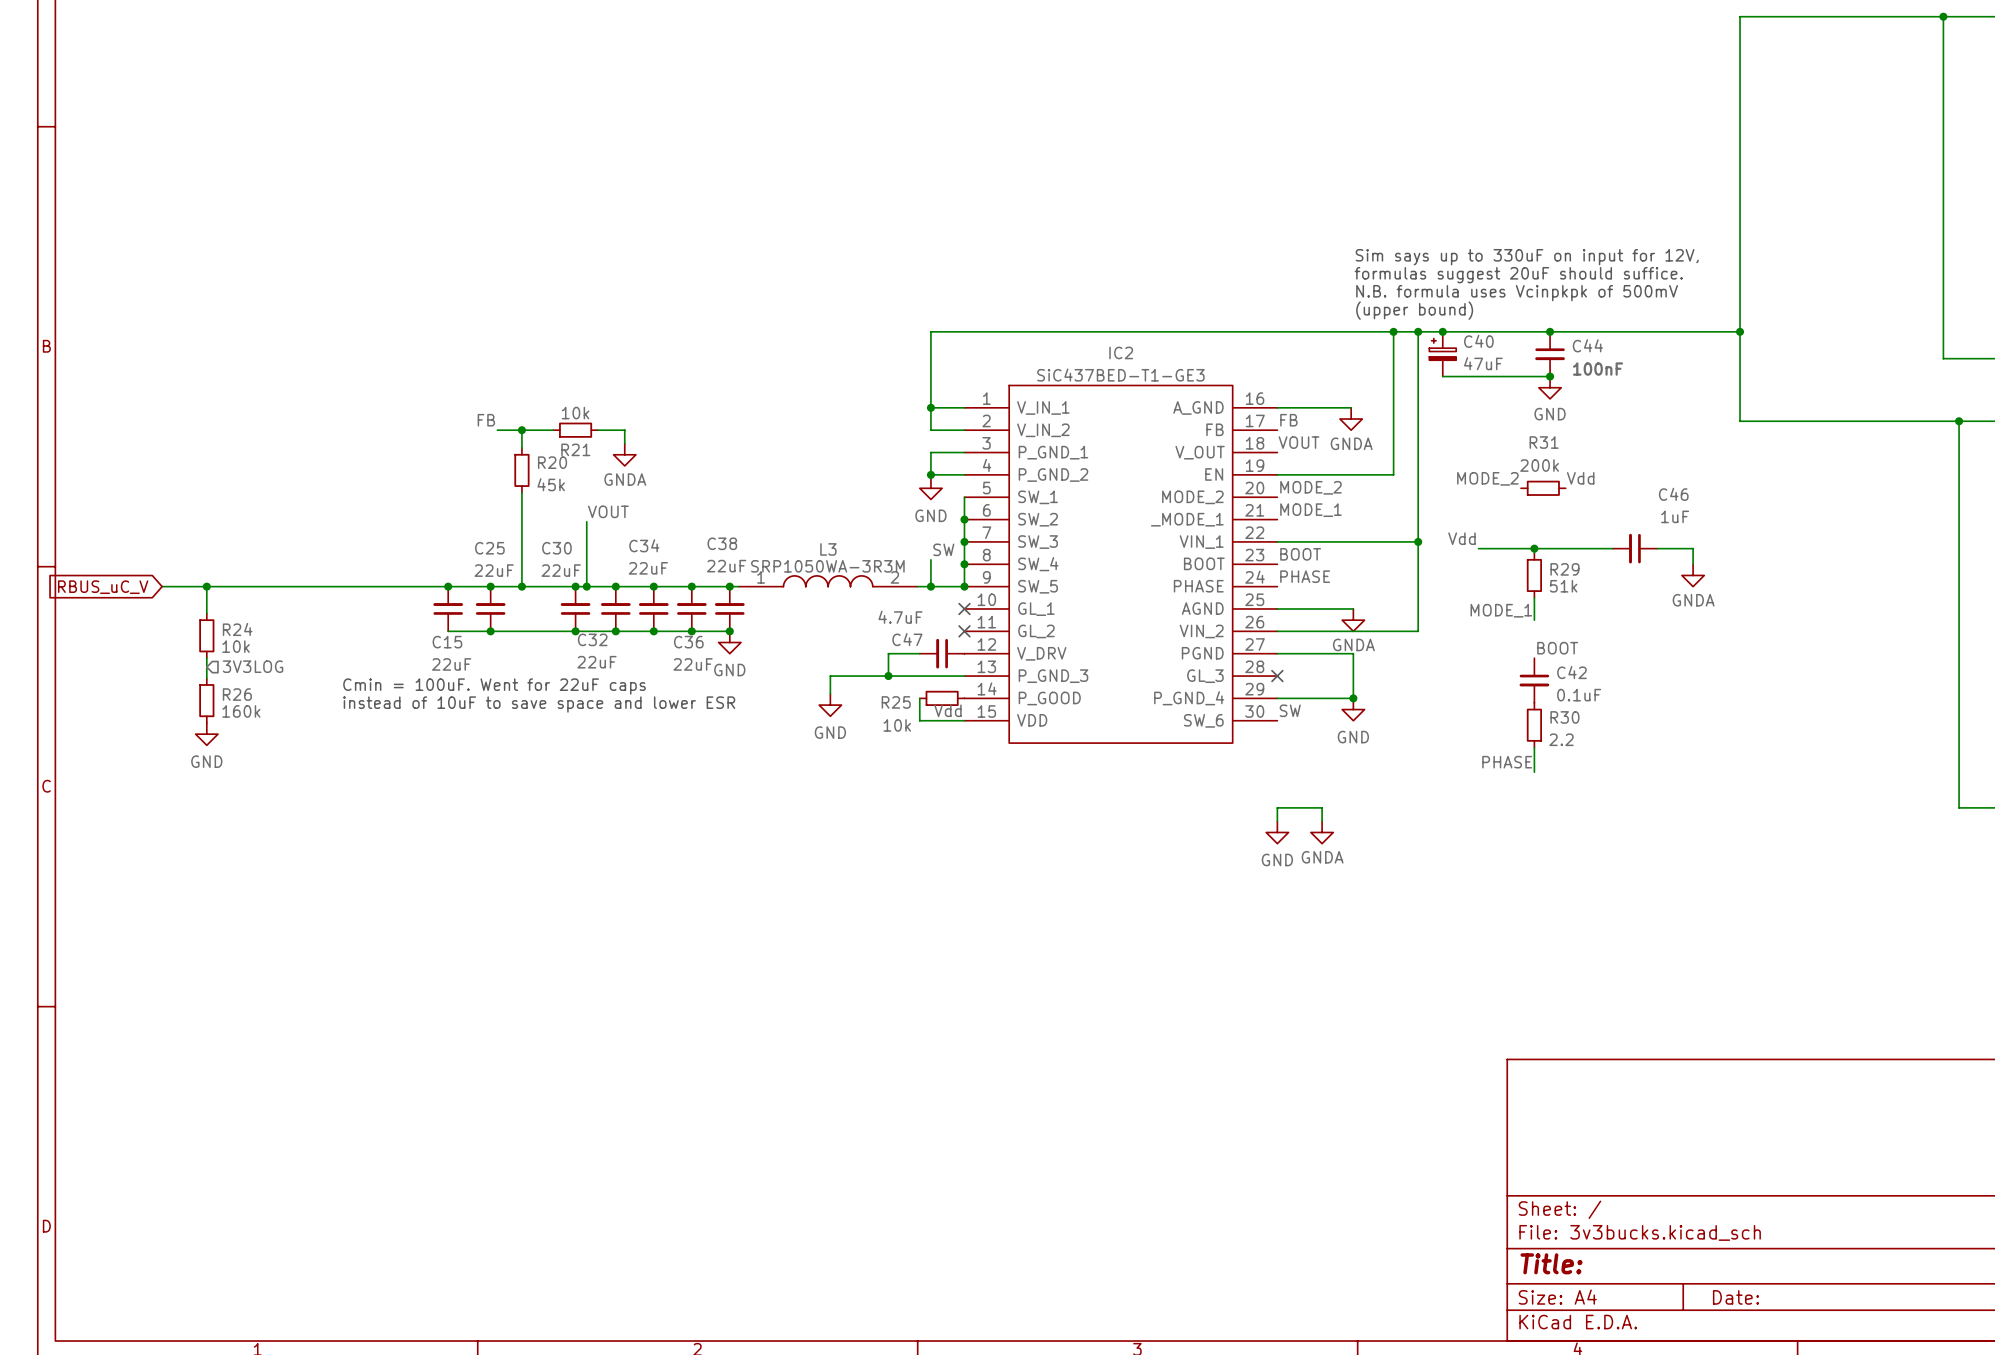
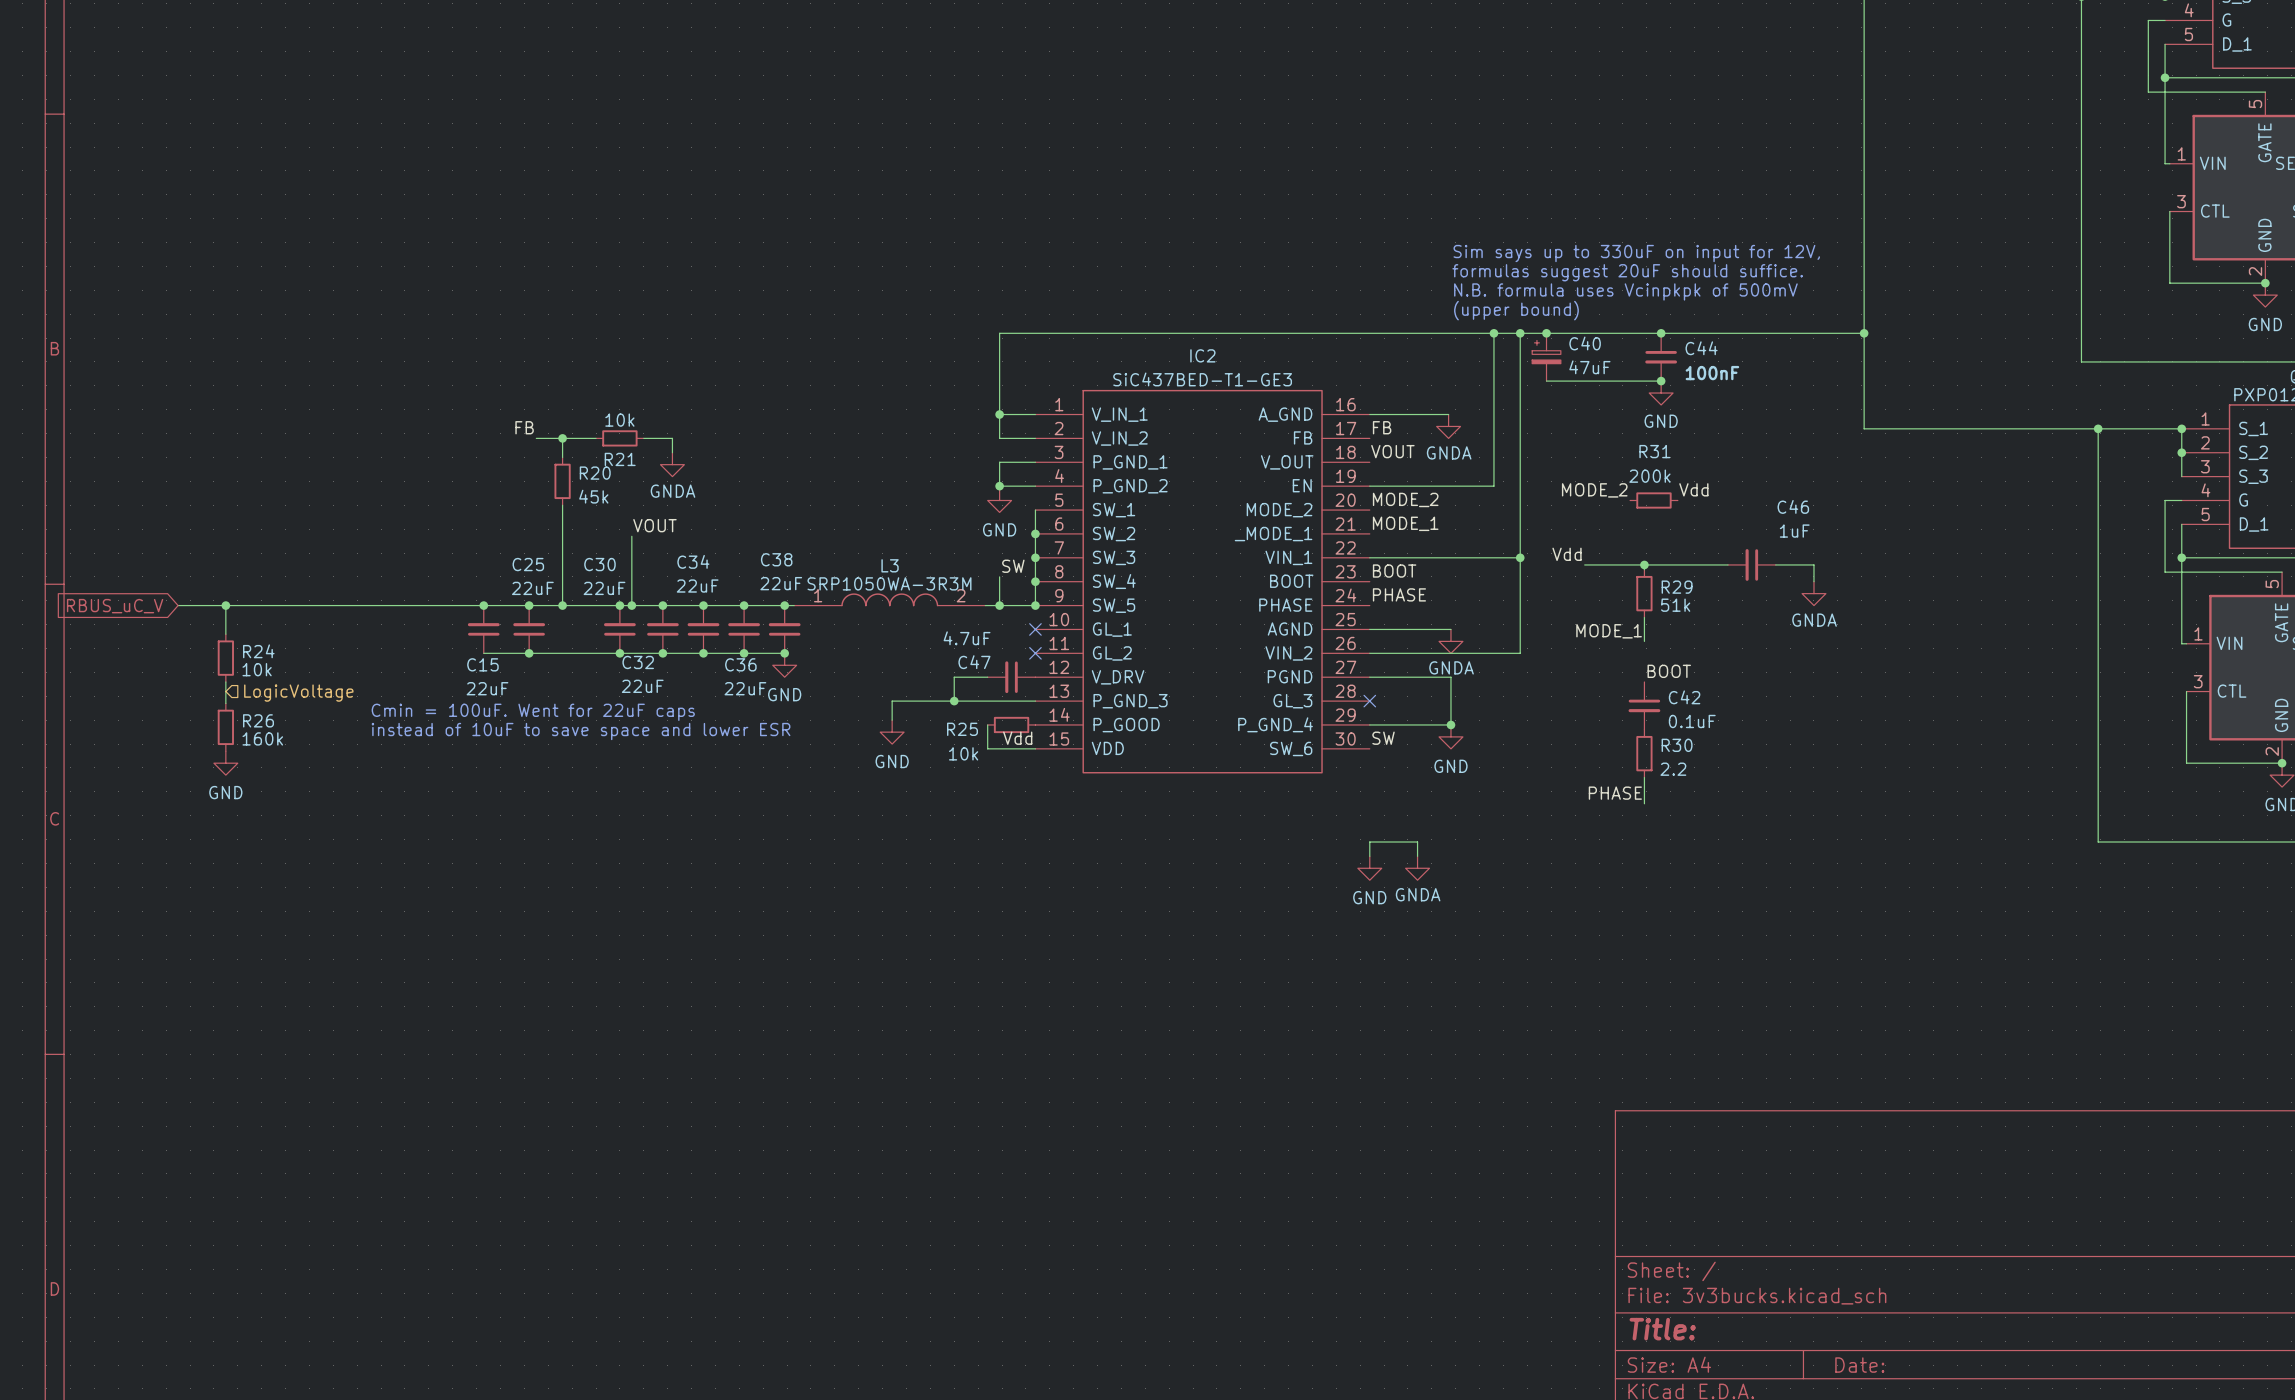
hierarchical label: 3V3LOG (253, 666) -> LogicVoltage (298, 693)

